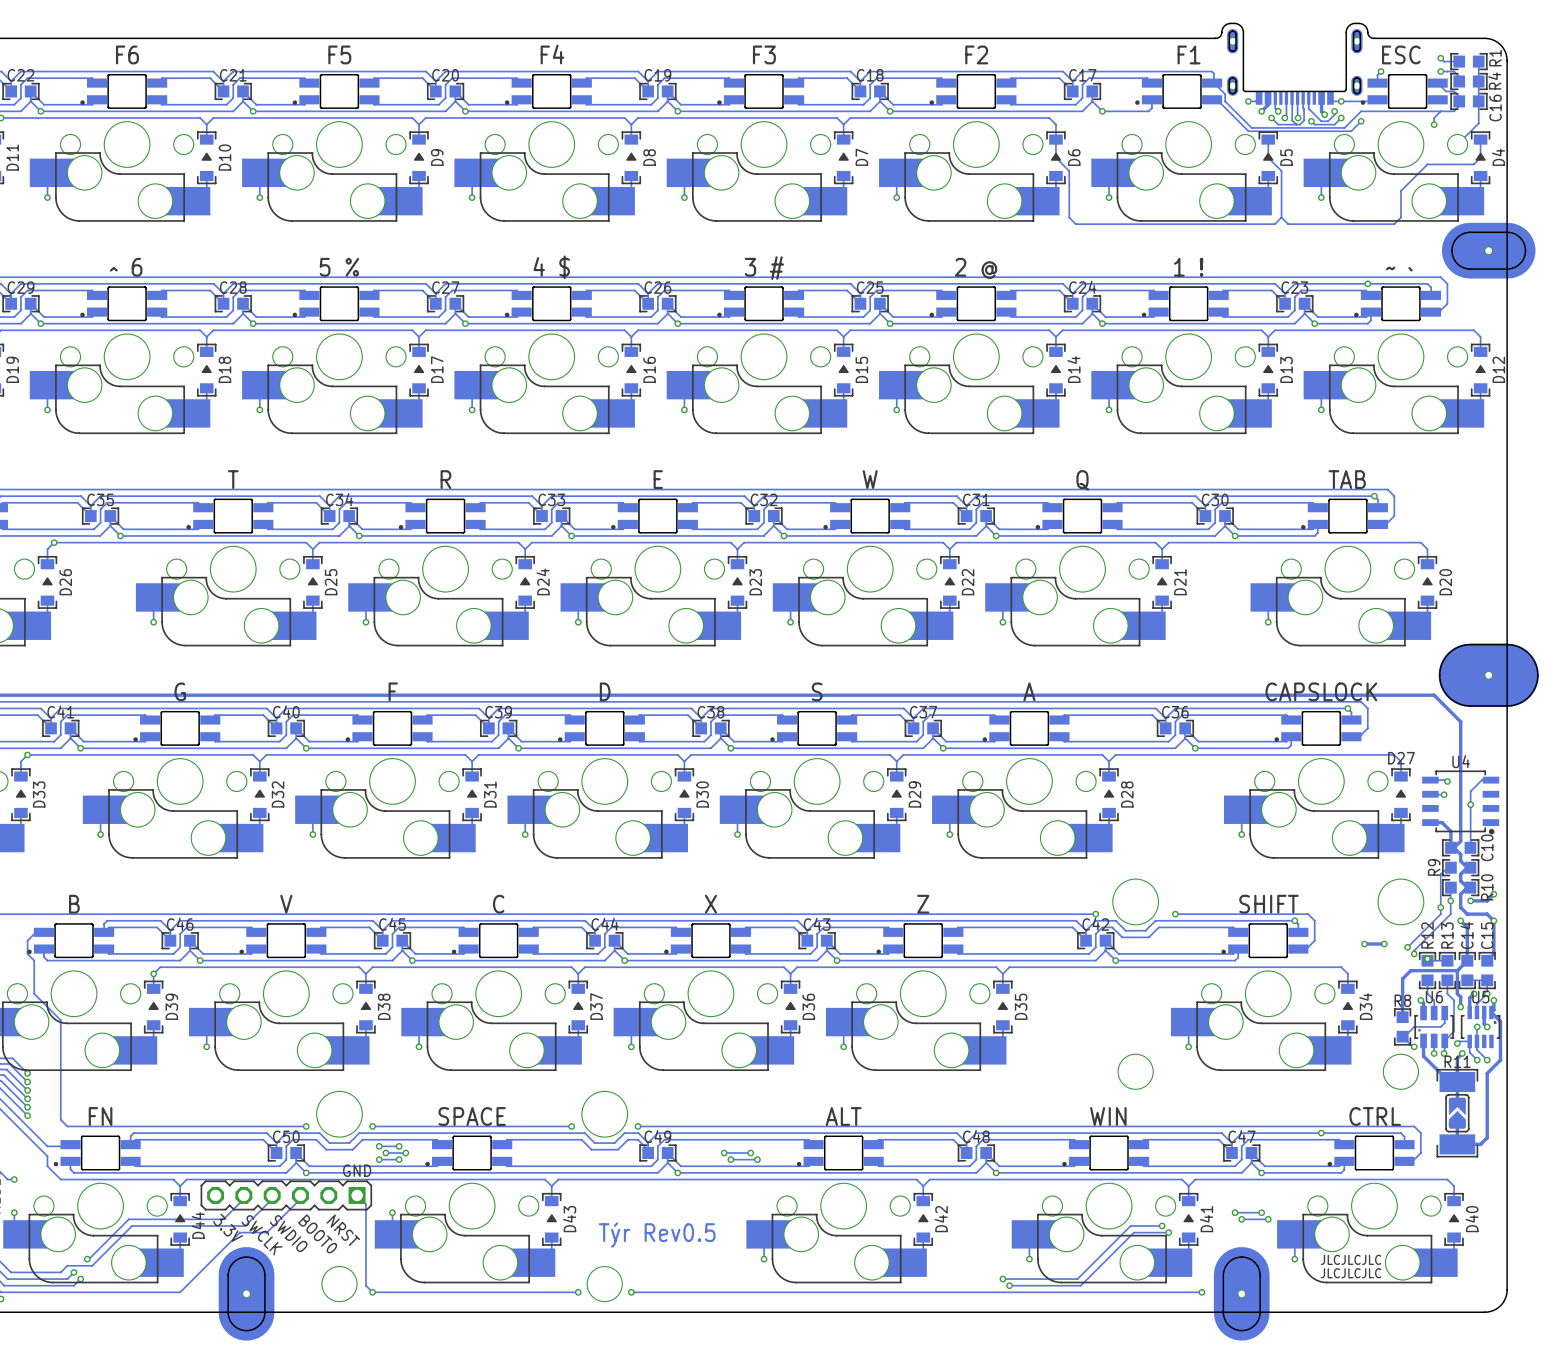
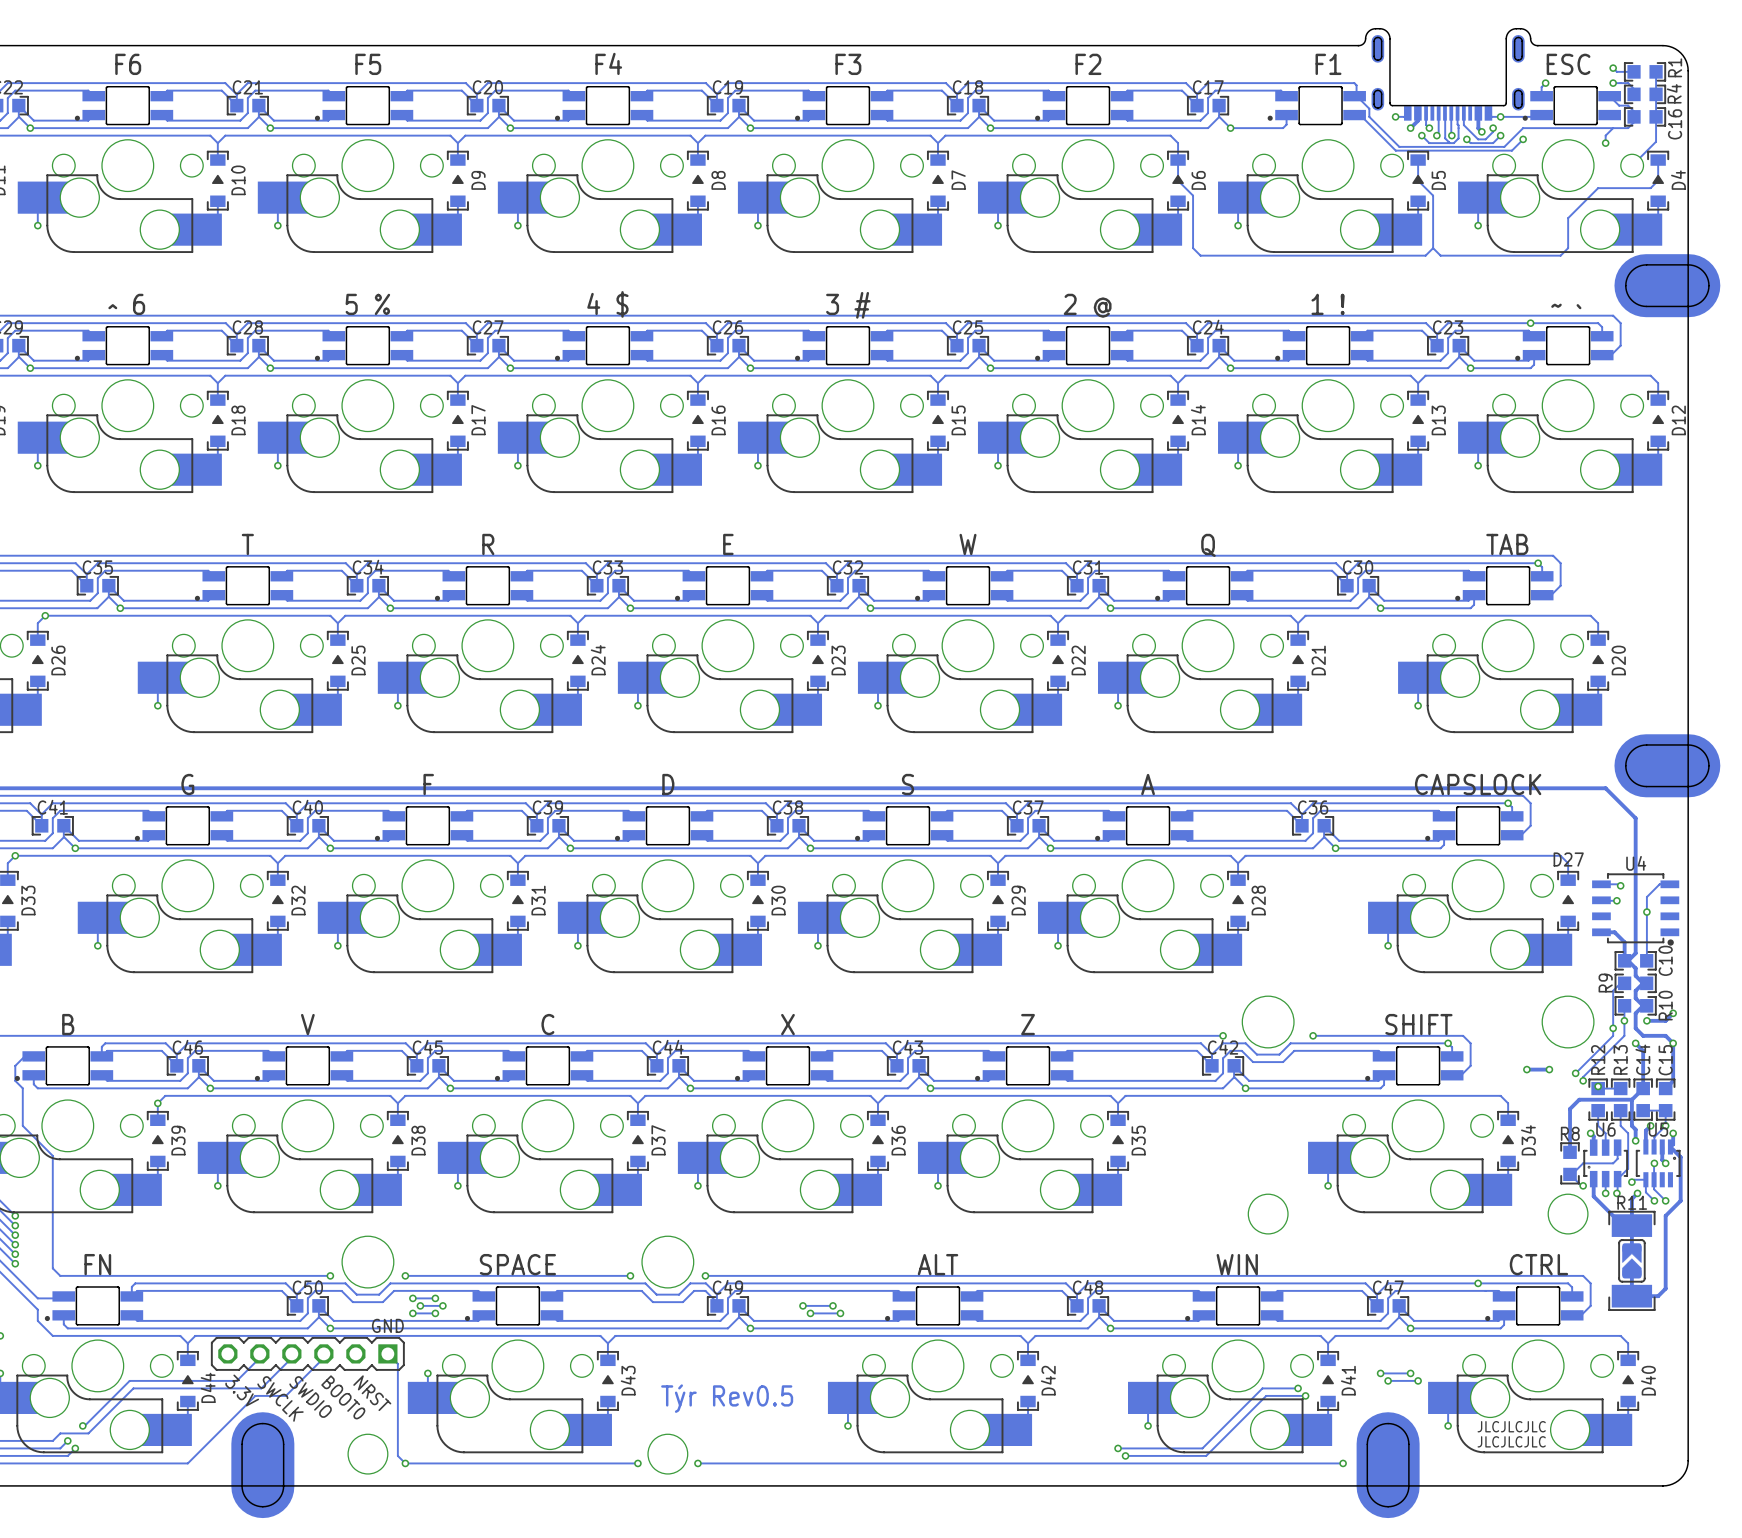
part footprint: [1227, 28, 1363, 105] -> [1371, 34, 1525, 121]
part footprint: [1441, 222, 1536, 279] -> [1614, 254, 1721, 318]
part footprint: [1438, 643, 1539, 708] -> [1614, 734, 1721, 798]
part footprint: [218, 1247, 275, 1341] -> [231, 1412, 295, 1519]
part footprint: [1213, 1247, 1270, 1341] -> [1356, 1412, 1420, 1519]

